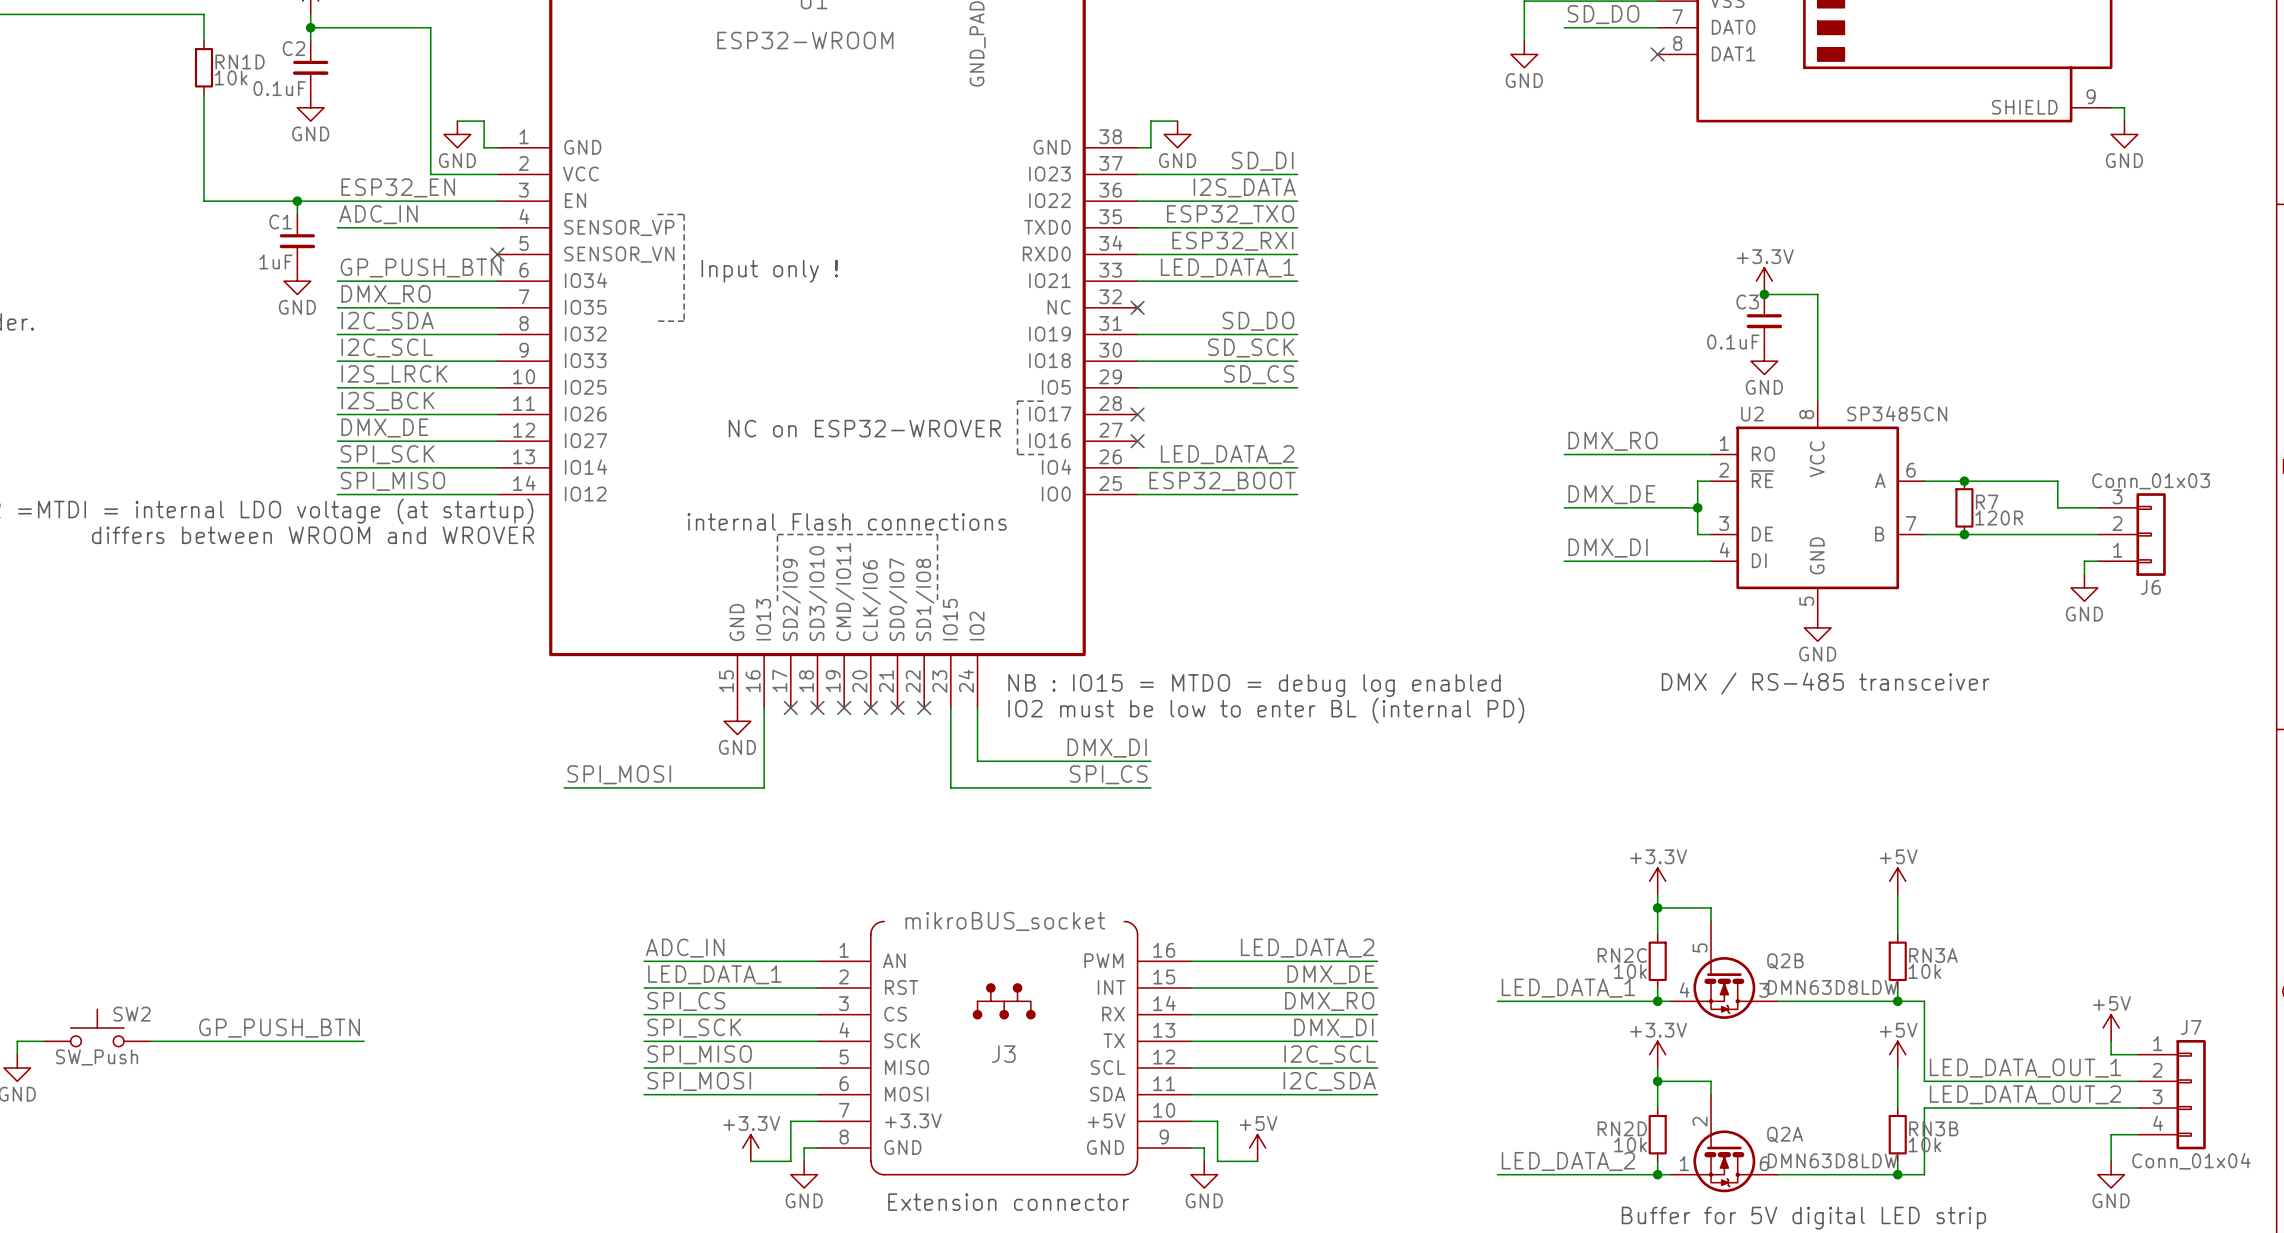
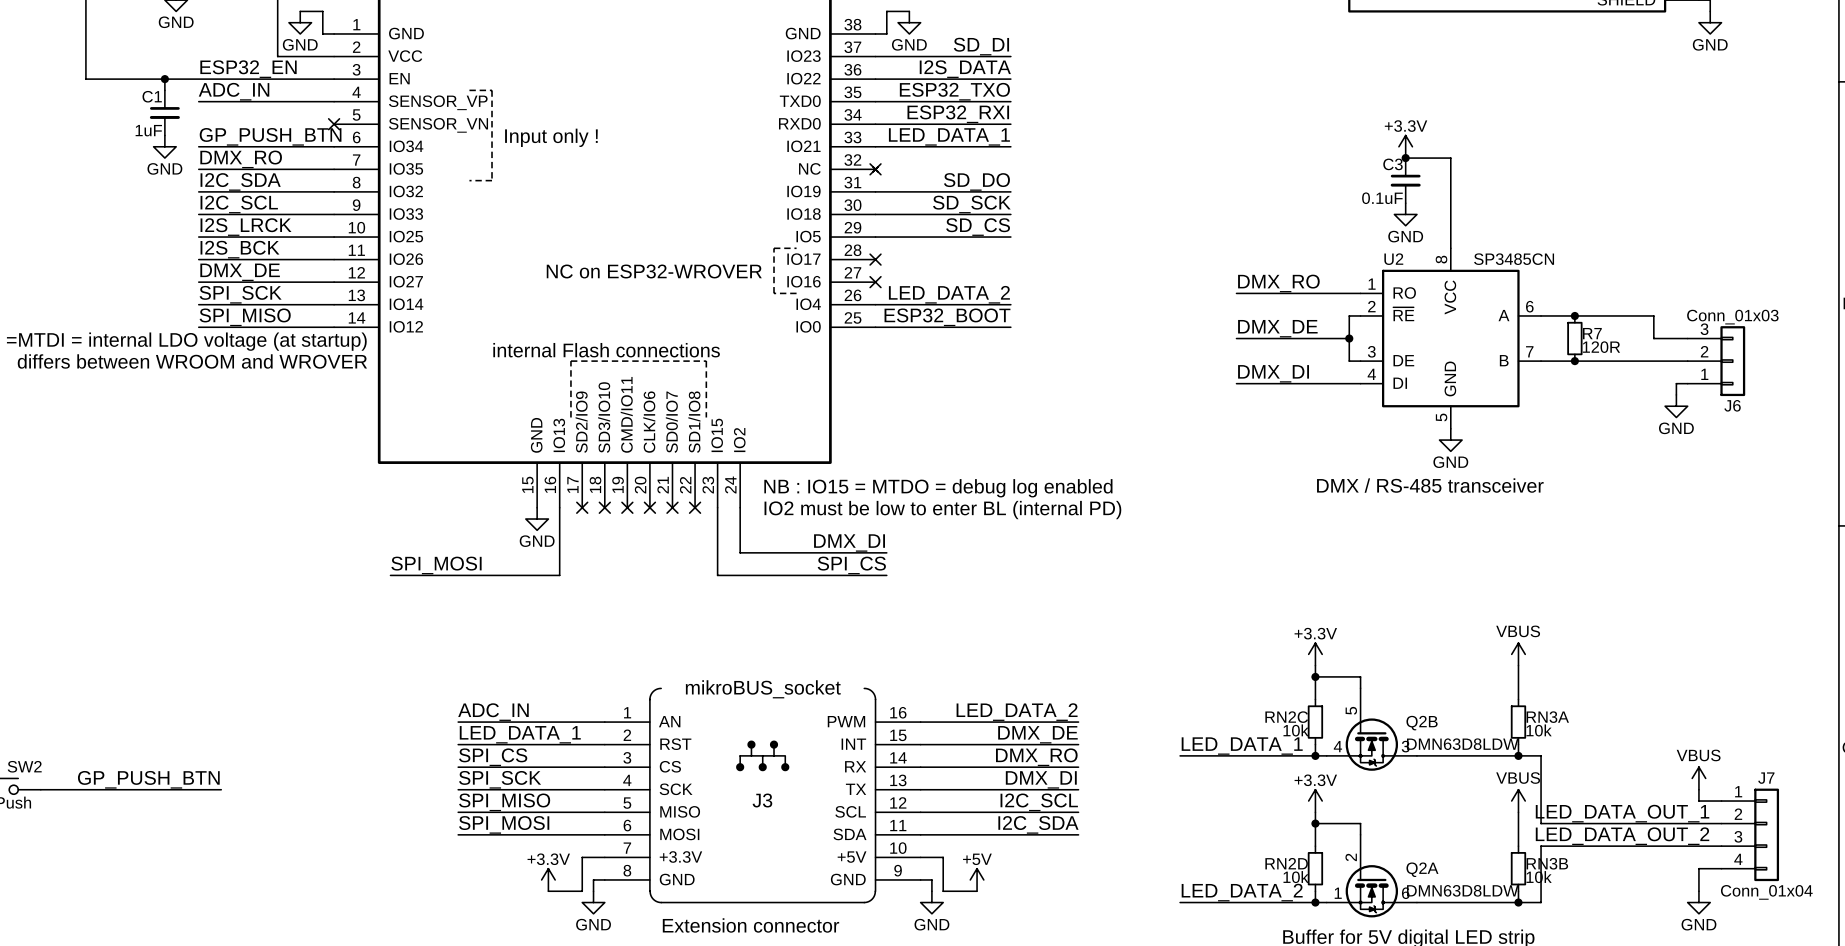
power symbol: +5V (1897, 881) -> VBUS (1518, 654)
power symbol: +5V (2111, 1027) -> VBUS (1698, 778)
power symbol: +5V (1897, 1054) -> VBUS (1518, 801)

